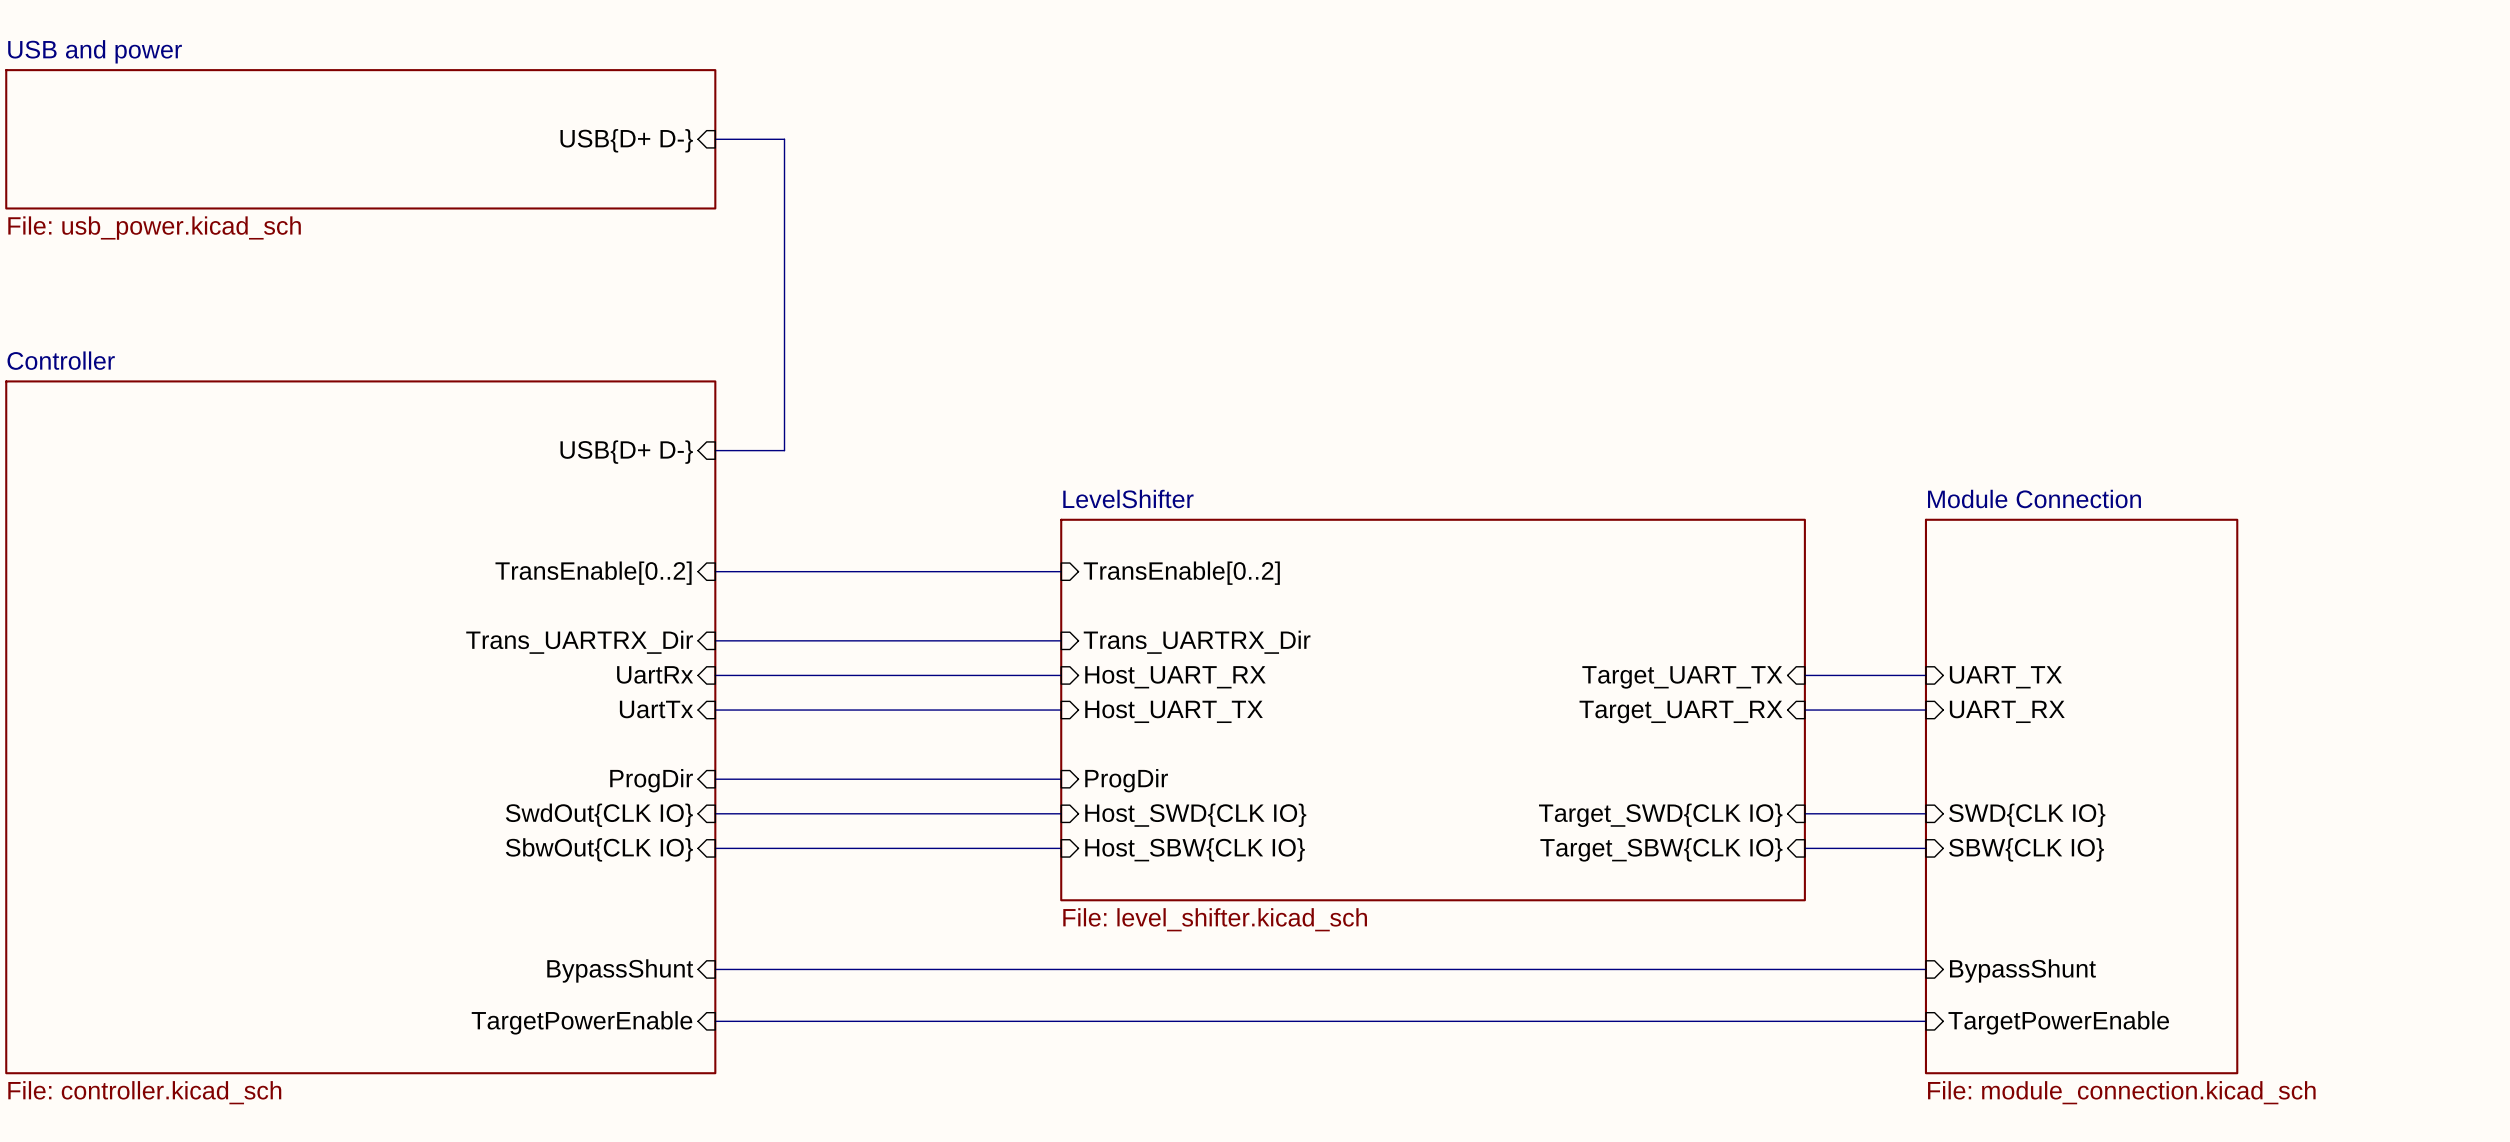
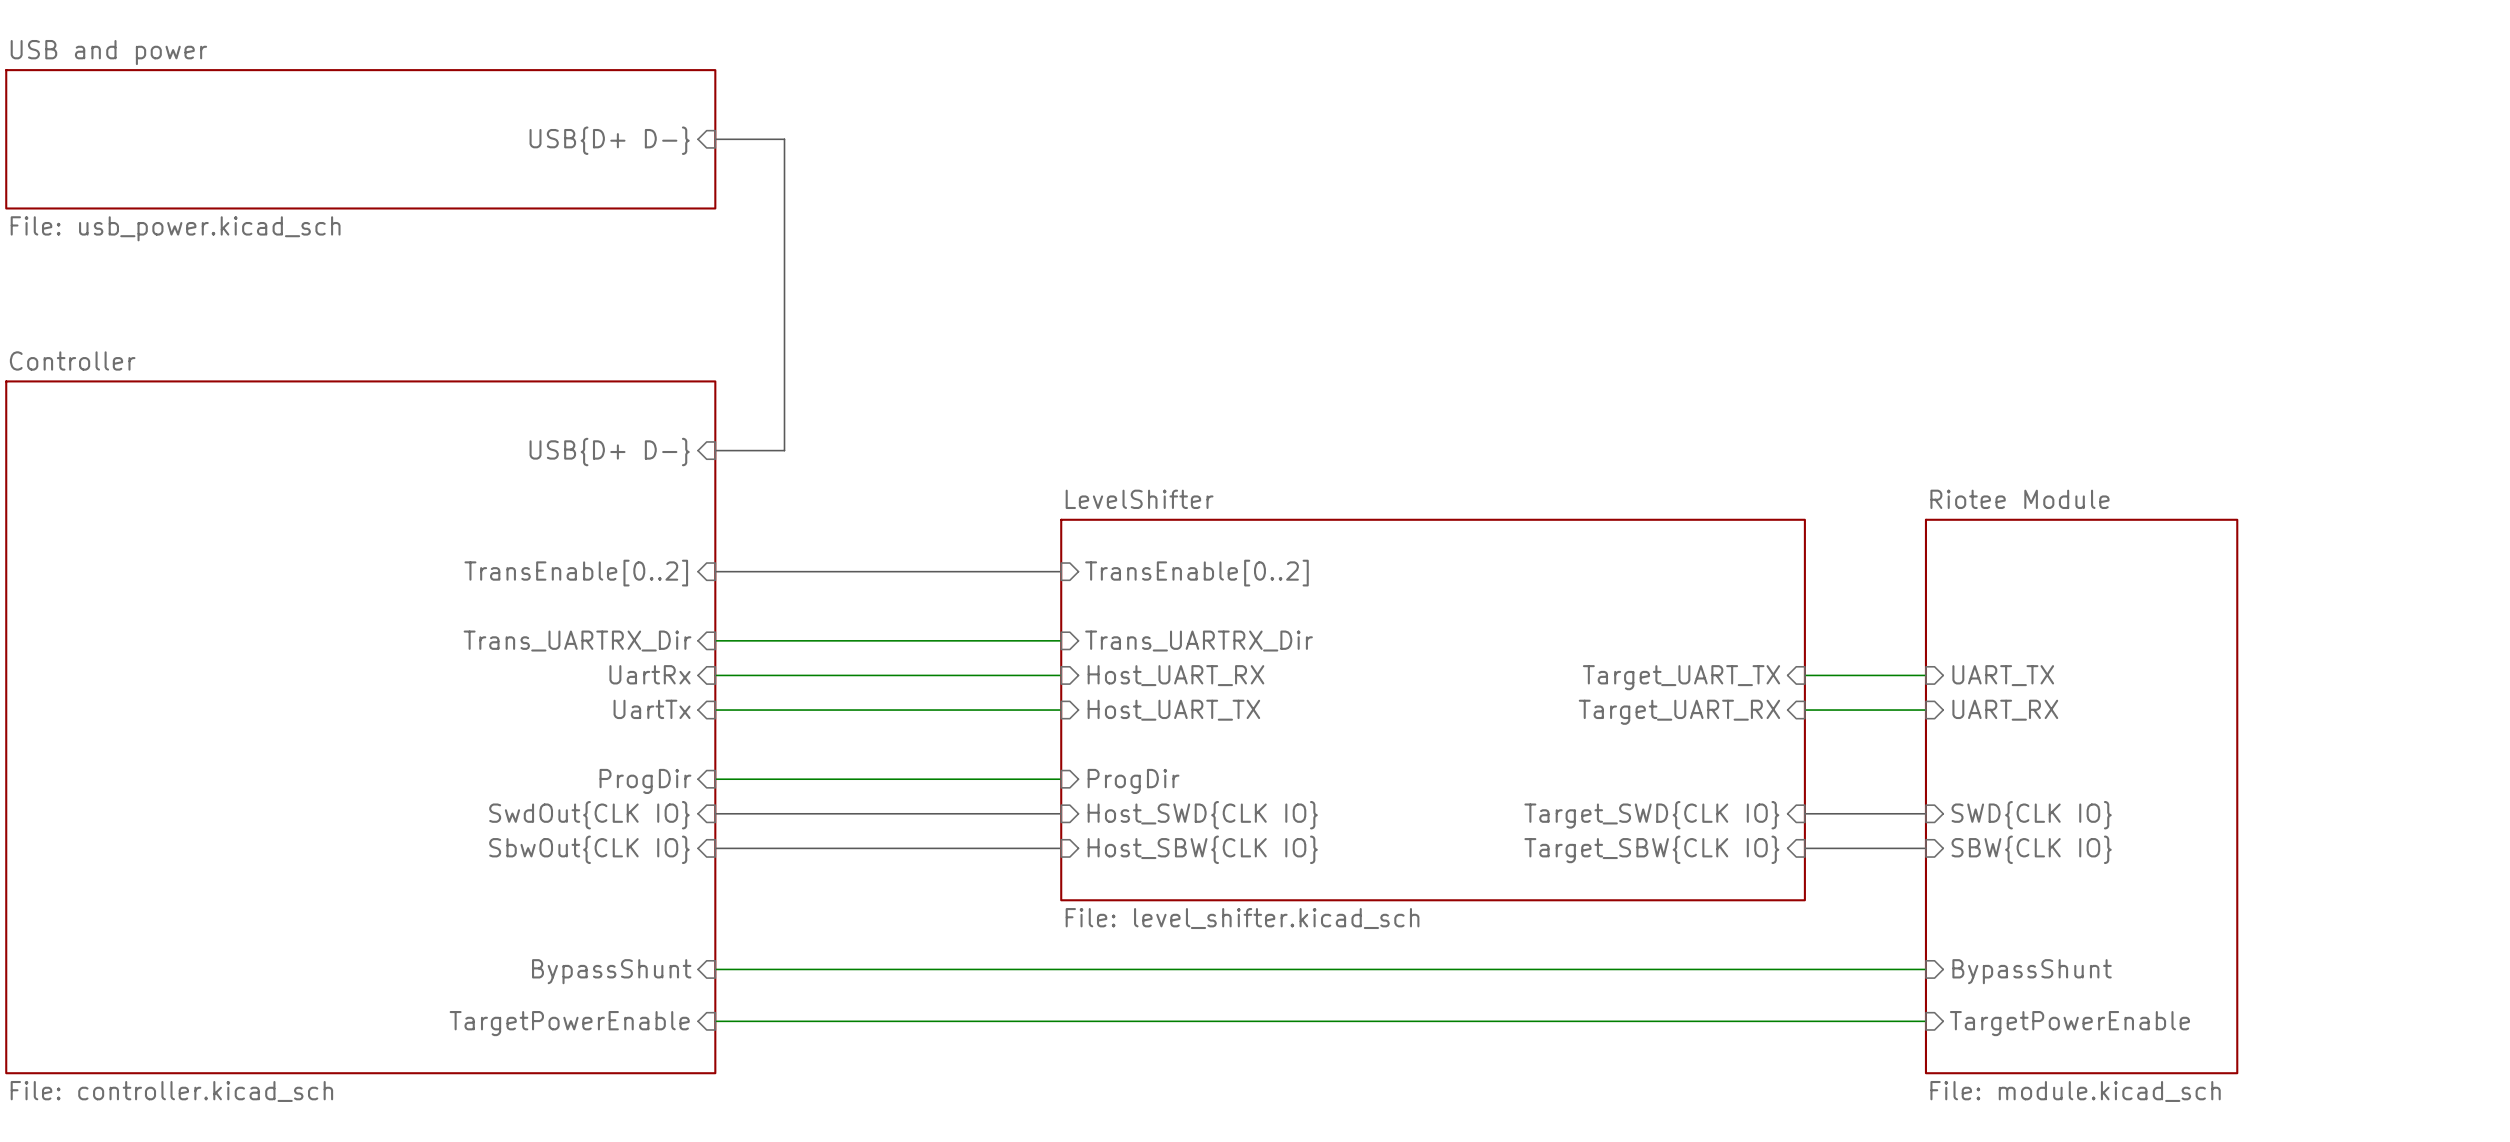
sheet Module Connection name: Module Connection (2034, 498) -> Riotee Module (2019, 499)
sheet Module Connection value: File: module_connection.kicad_sch (2121, 1092) -> File: module.kicad_sch (2075, 1091)

